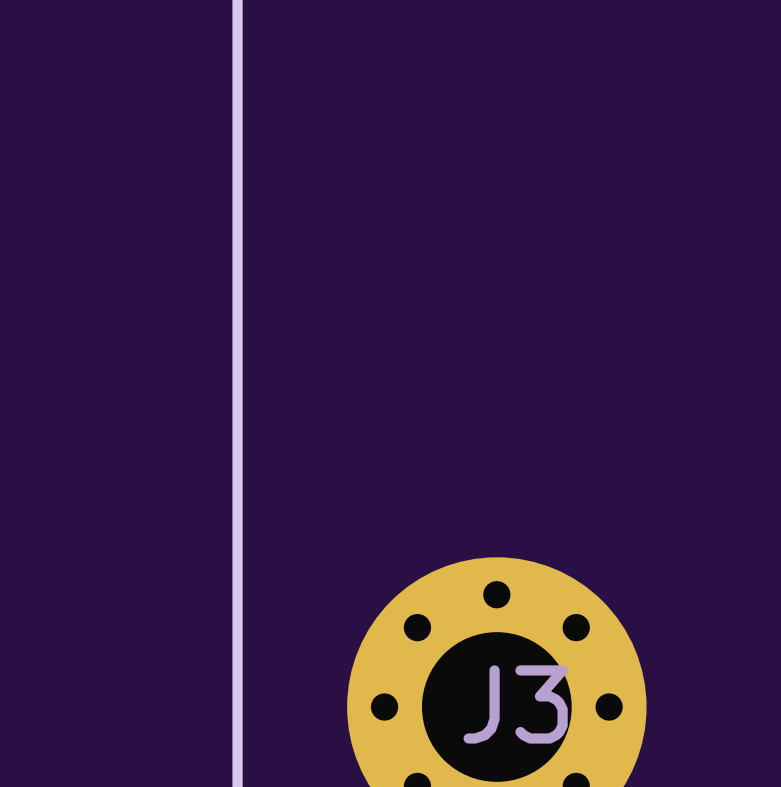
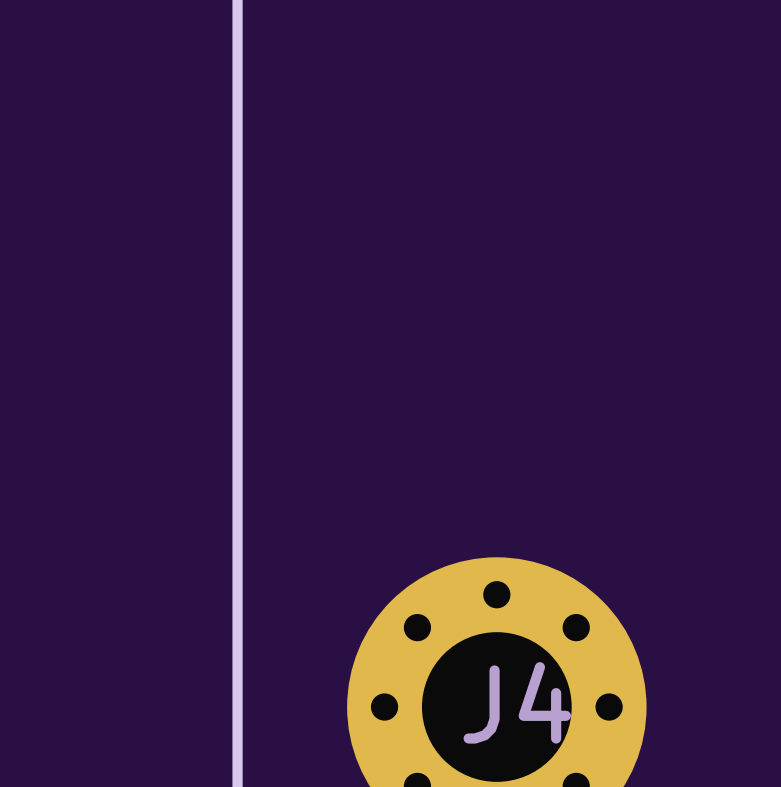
J3 name: J3 (515, 704) -> J4 (517, 702)

